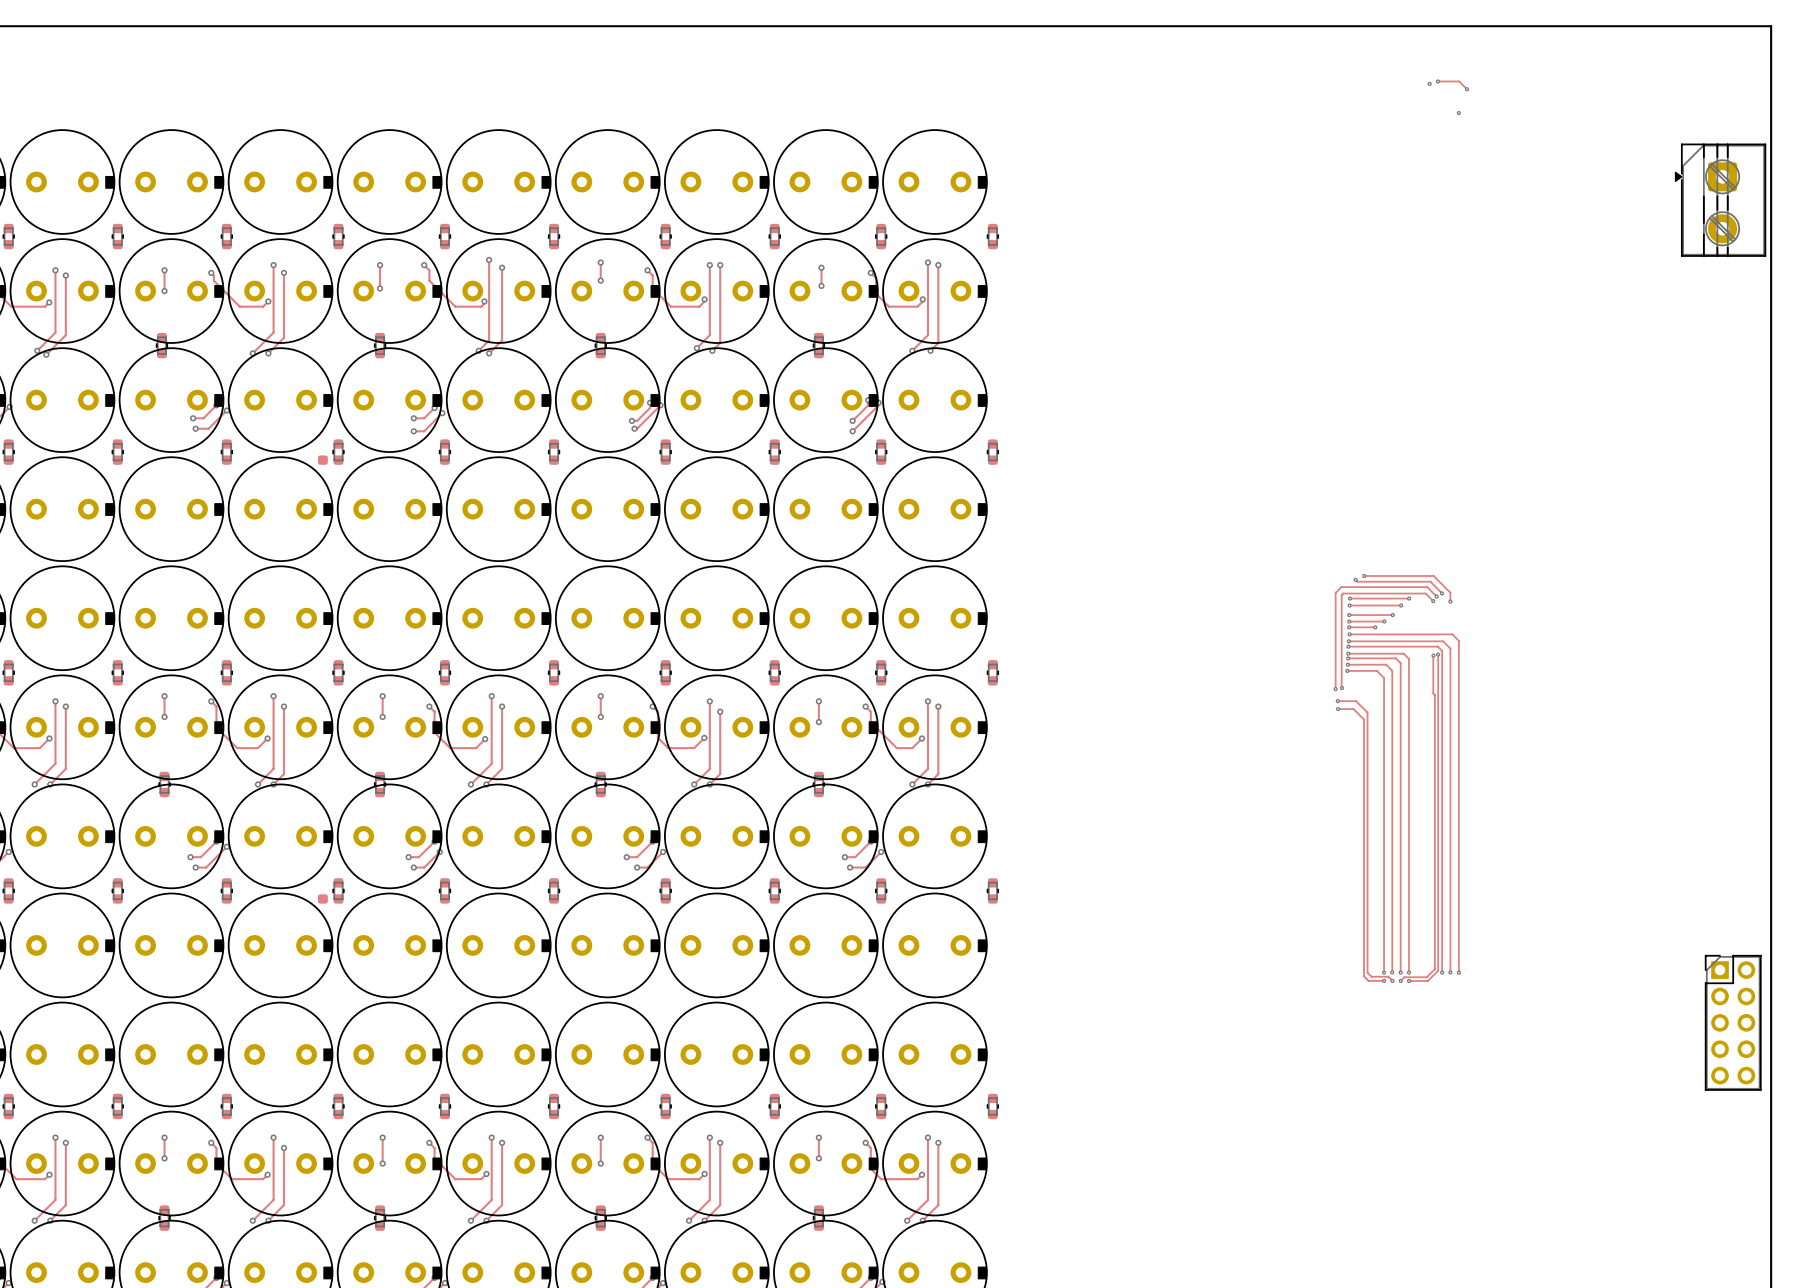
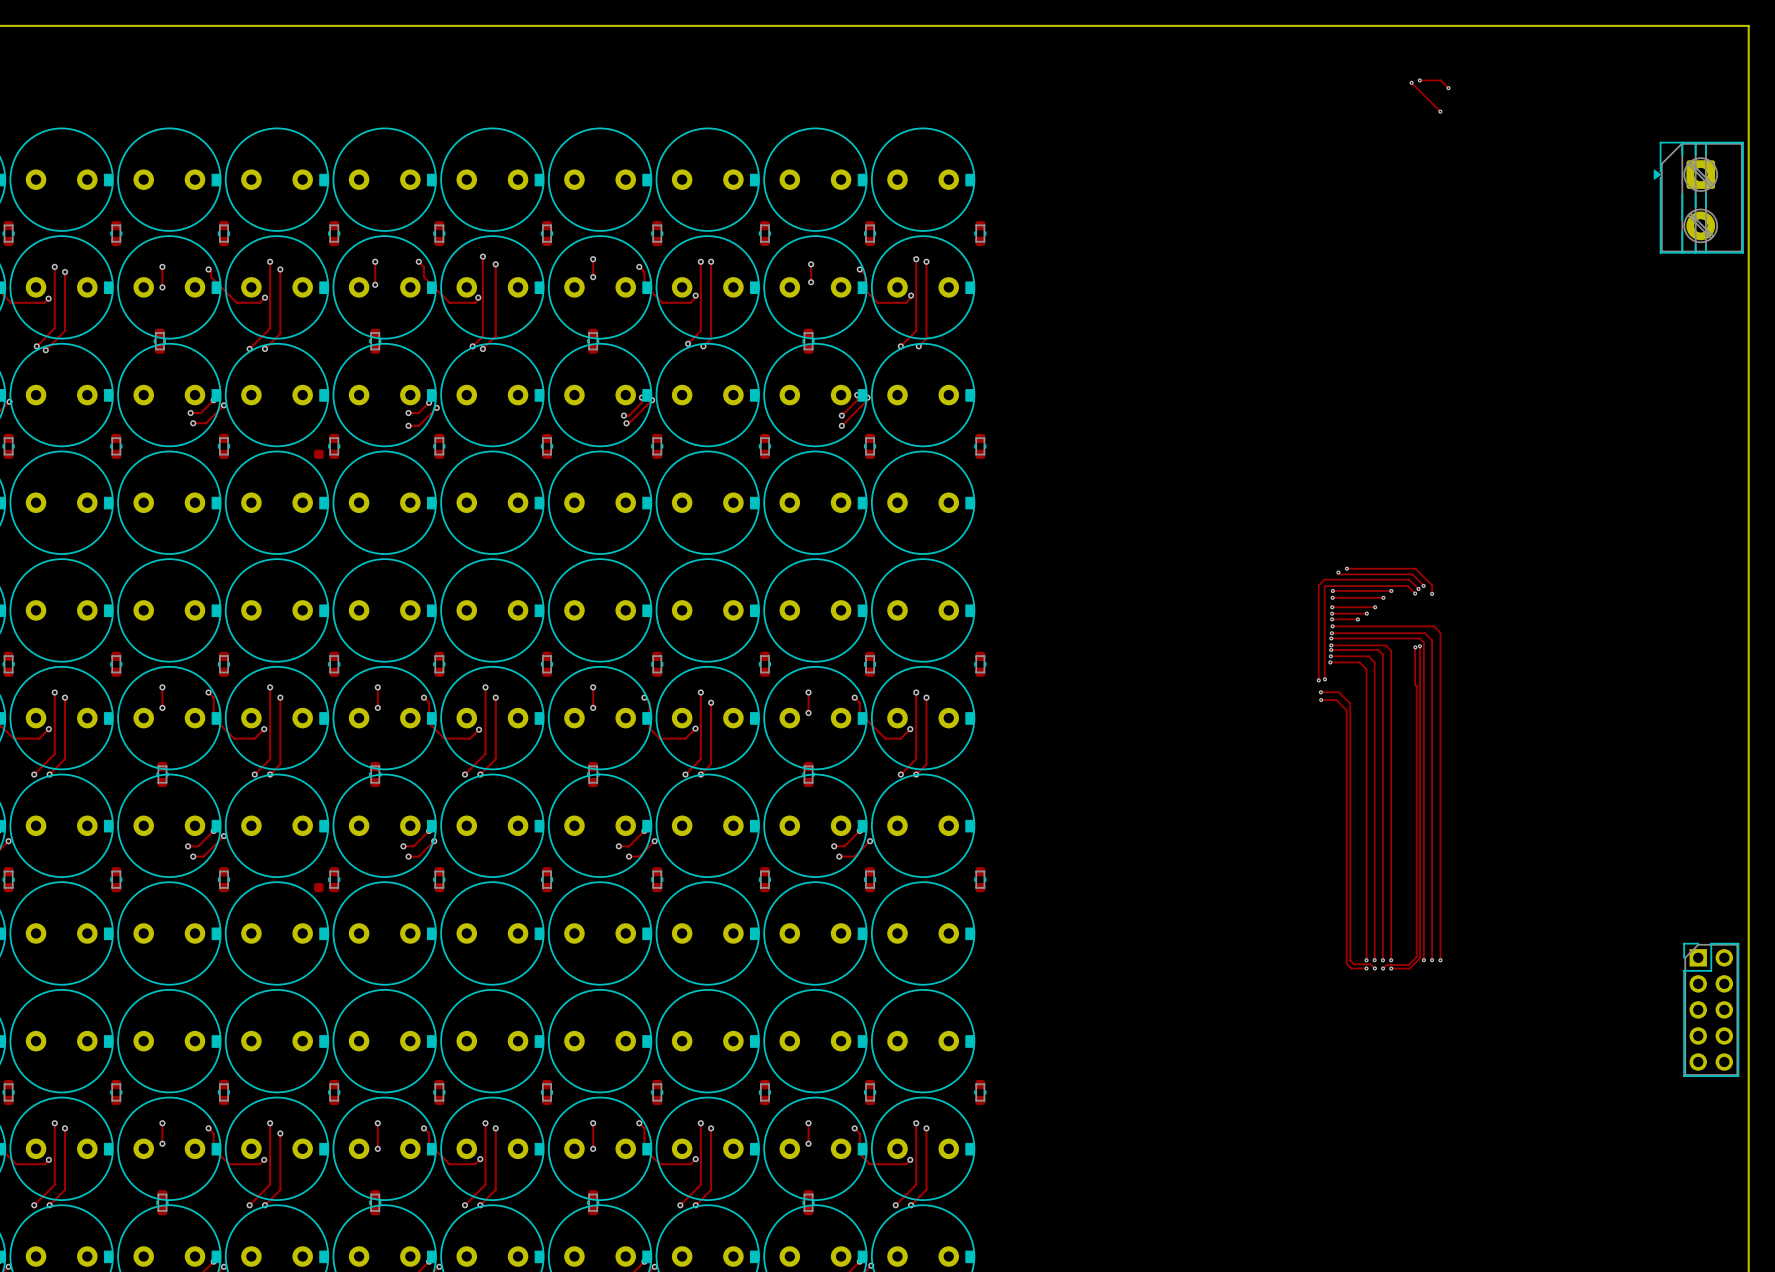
track: none -> (1411, 82) (1440, 111)

